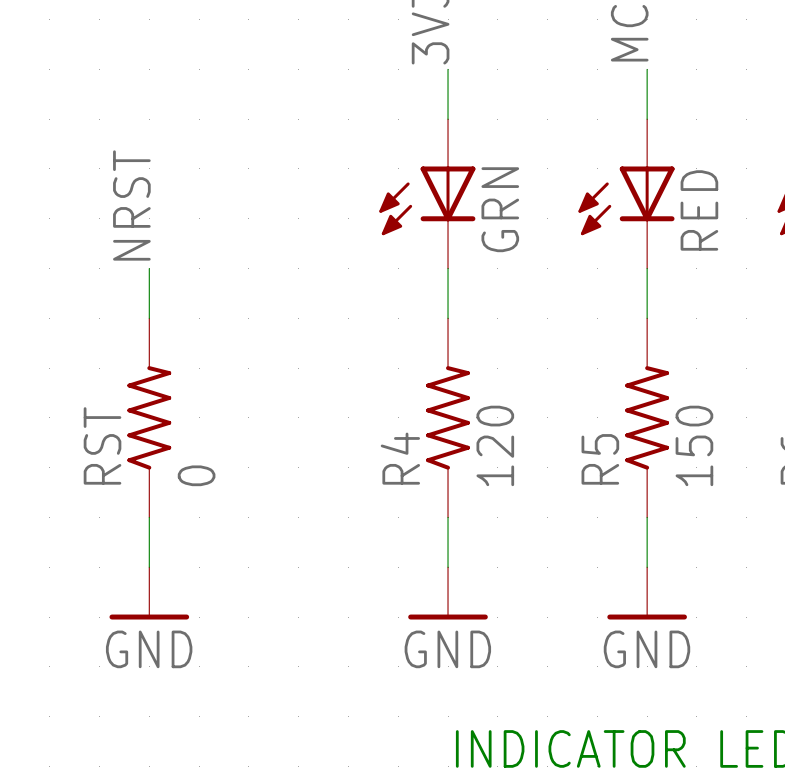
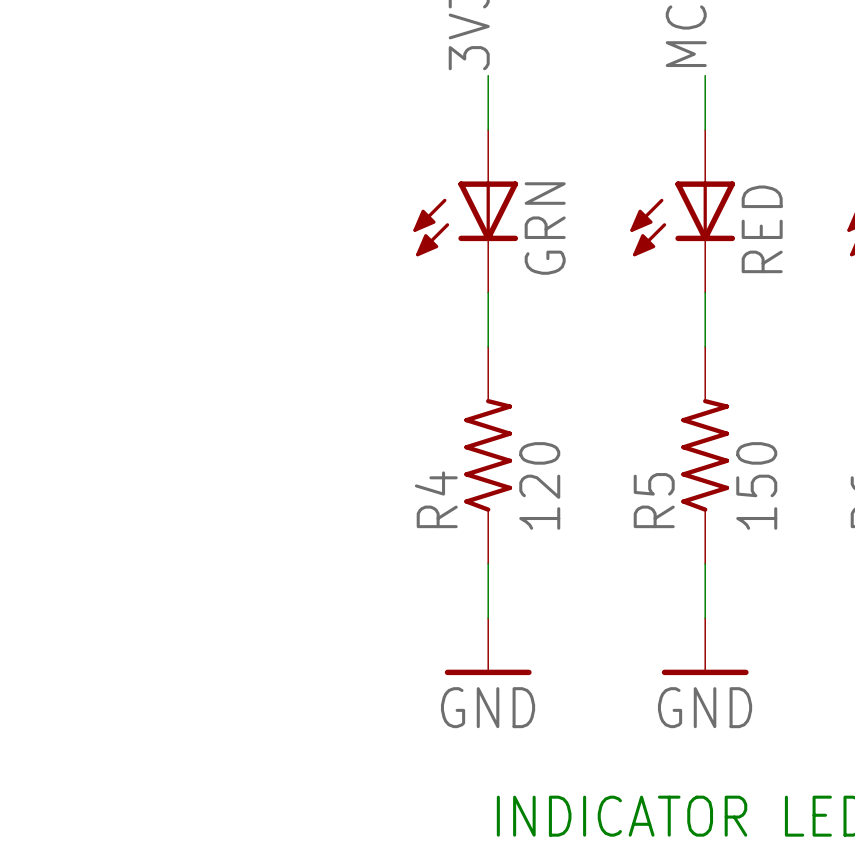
label: NRST (131, 205) -> none
wire: (149, 268) (149, 318) -> none
RST: 0 (149, 417) -> none
wire: (149, 517) (149, 567) -> none
power symbol: GND (149, 593) -> none

